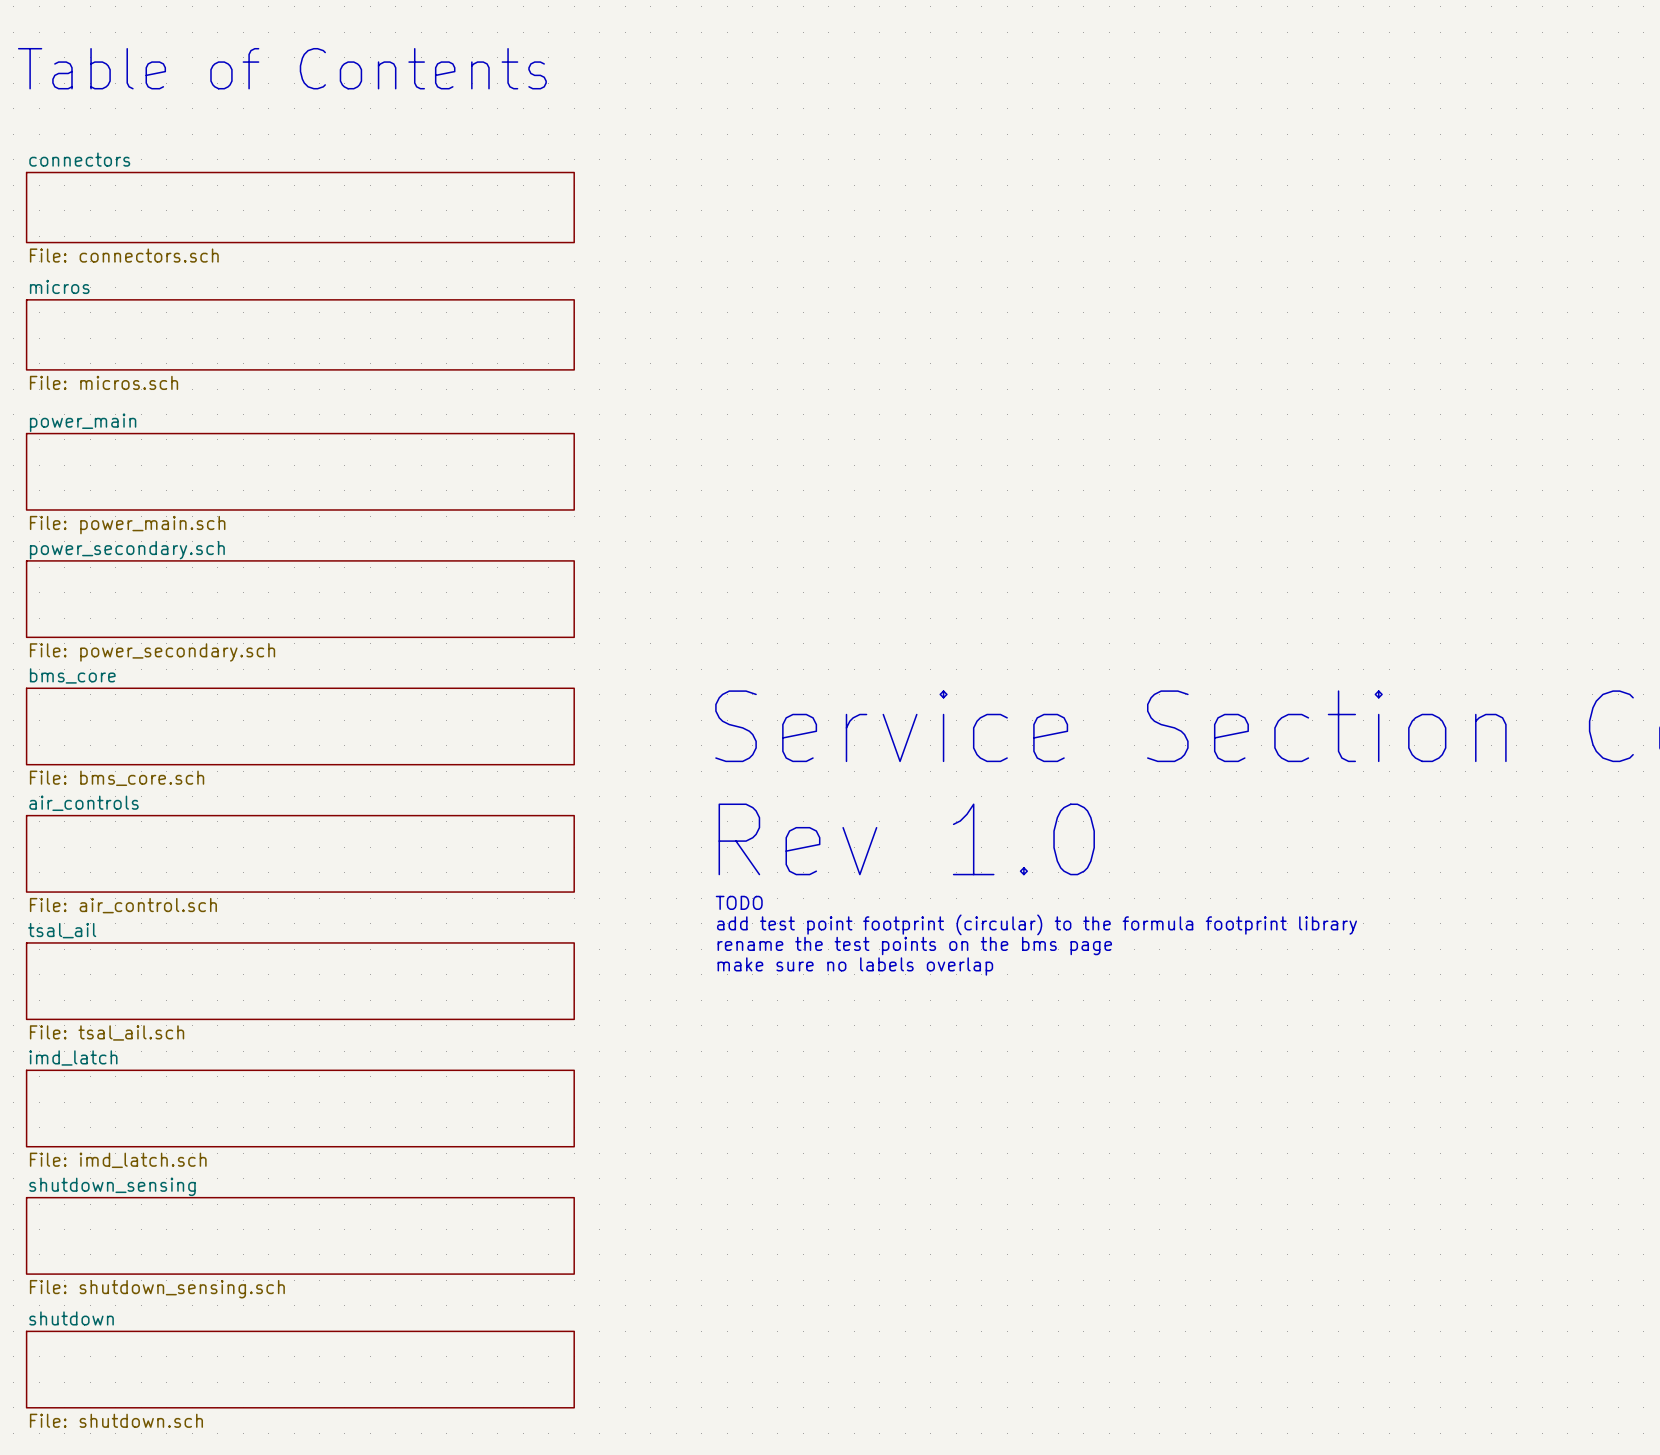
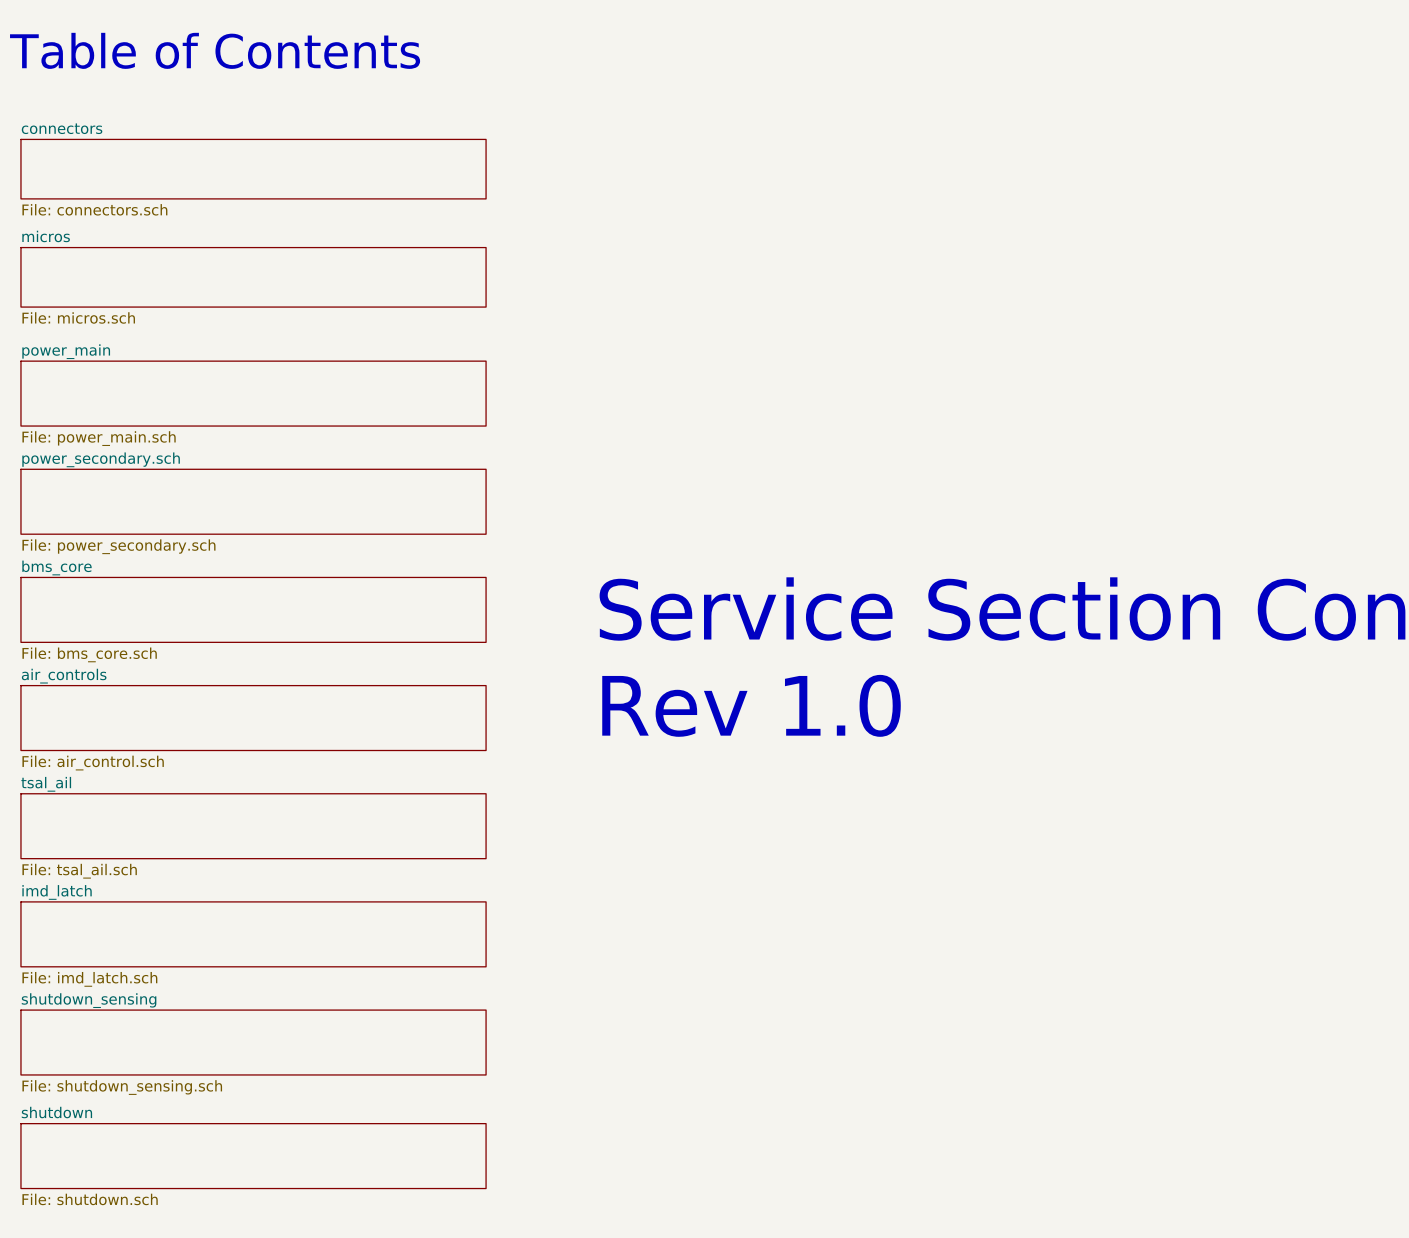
text: TODO (739, 902) -> none
text: add test point footprint (circular) to the formula footprint library (1036, 924) -> none
text: rename the test points on the bms page (914, 945) -> none
text: make sure no labels overlap (855, 966) -> none

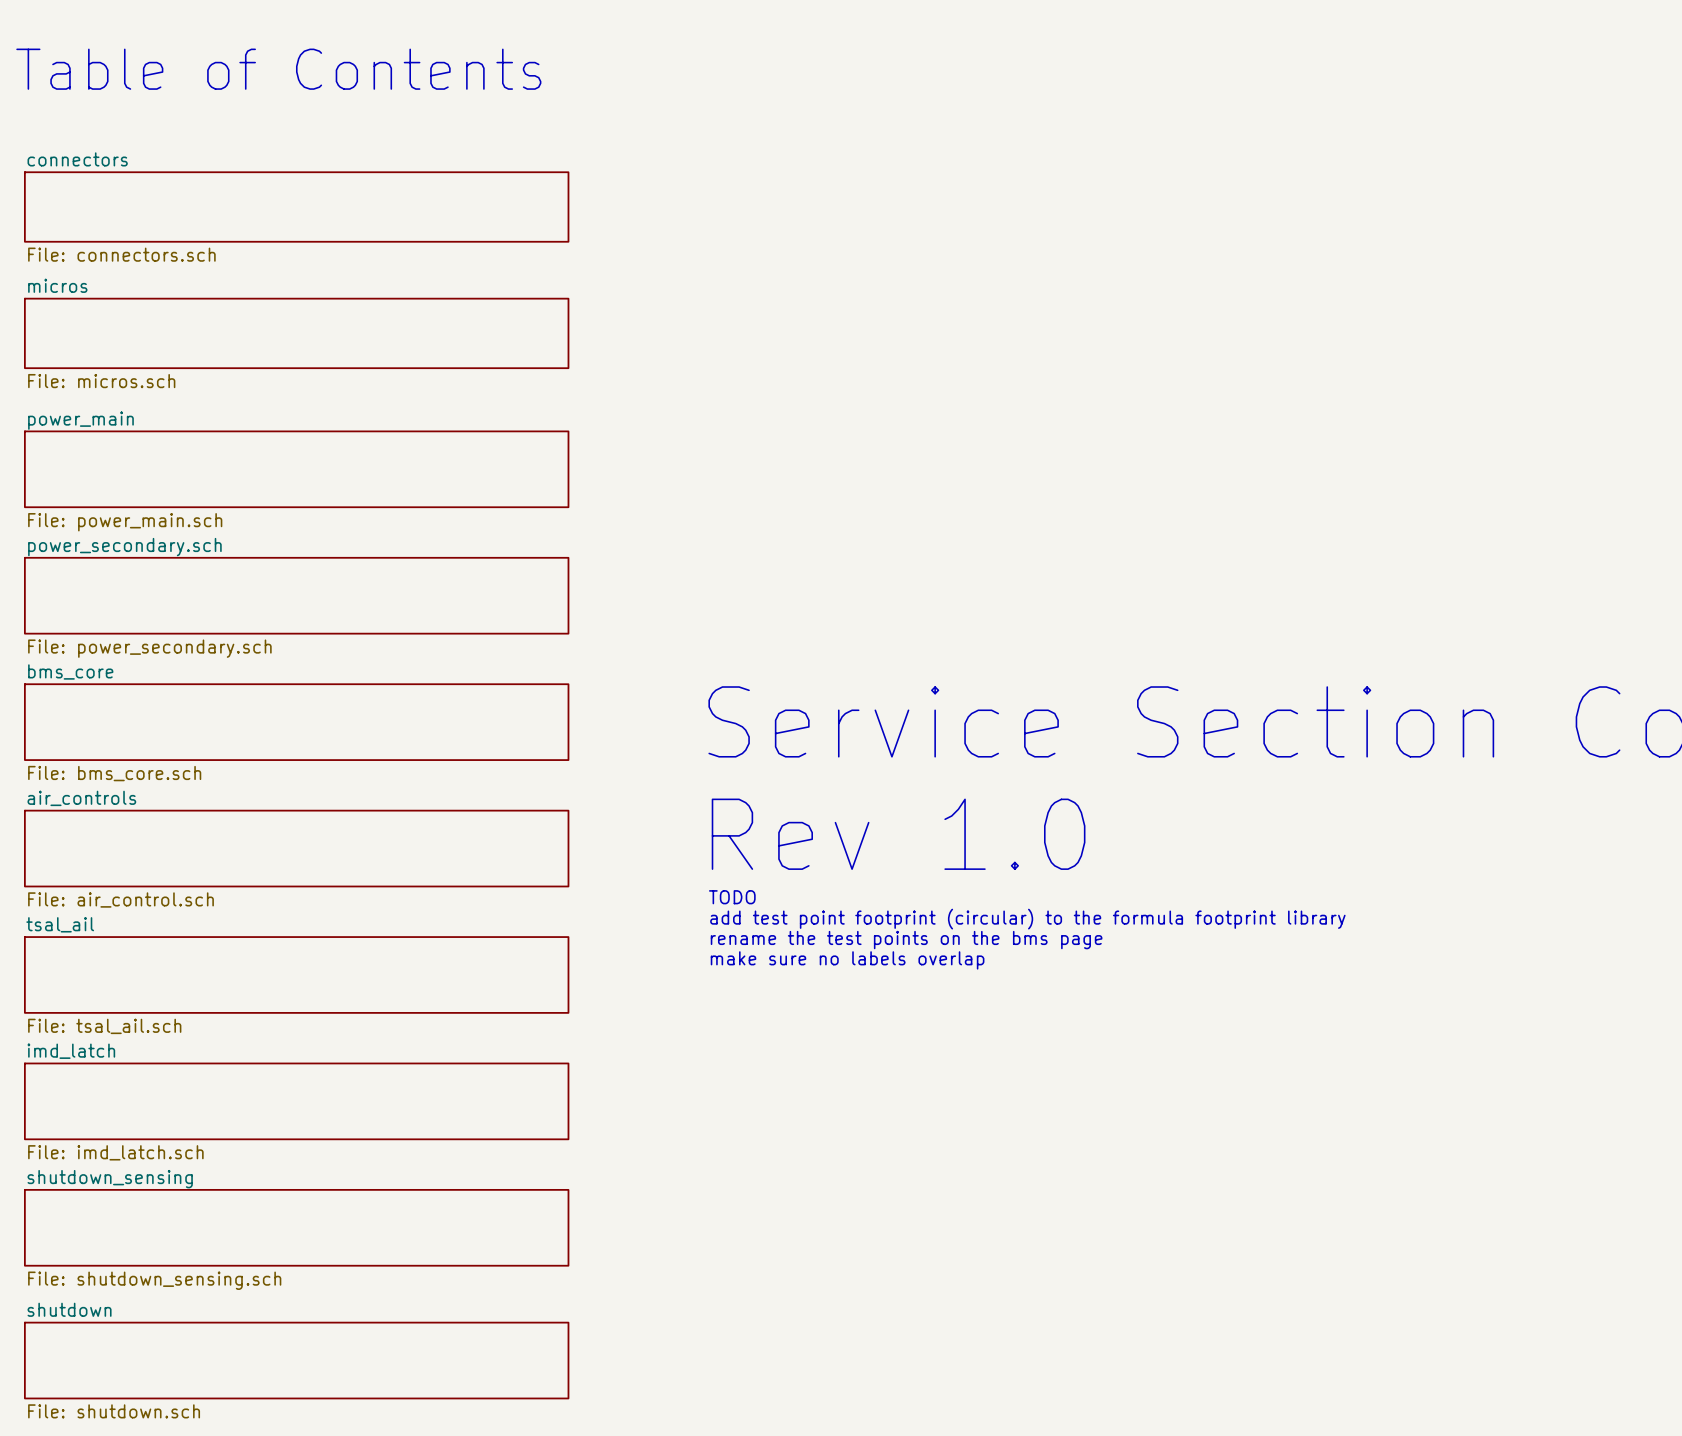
text: none -> TODO (732, 897)
text: none -> add test point footprint (circular) to the formula footprint library (1027, 919)
text: none -> rename the test points on the bms page (906, 940)
text: none -> make sure no labels overlap (847, 960)

